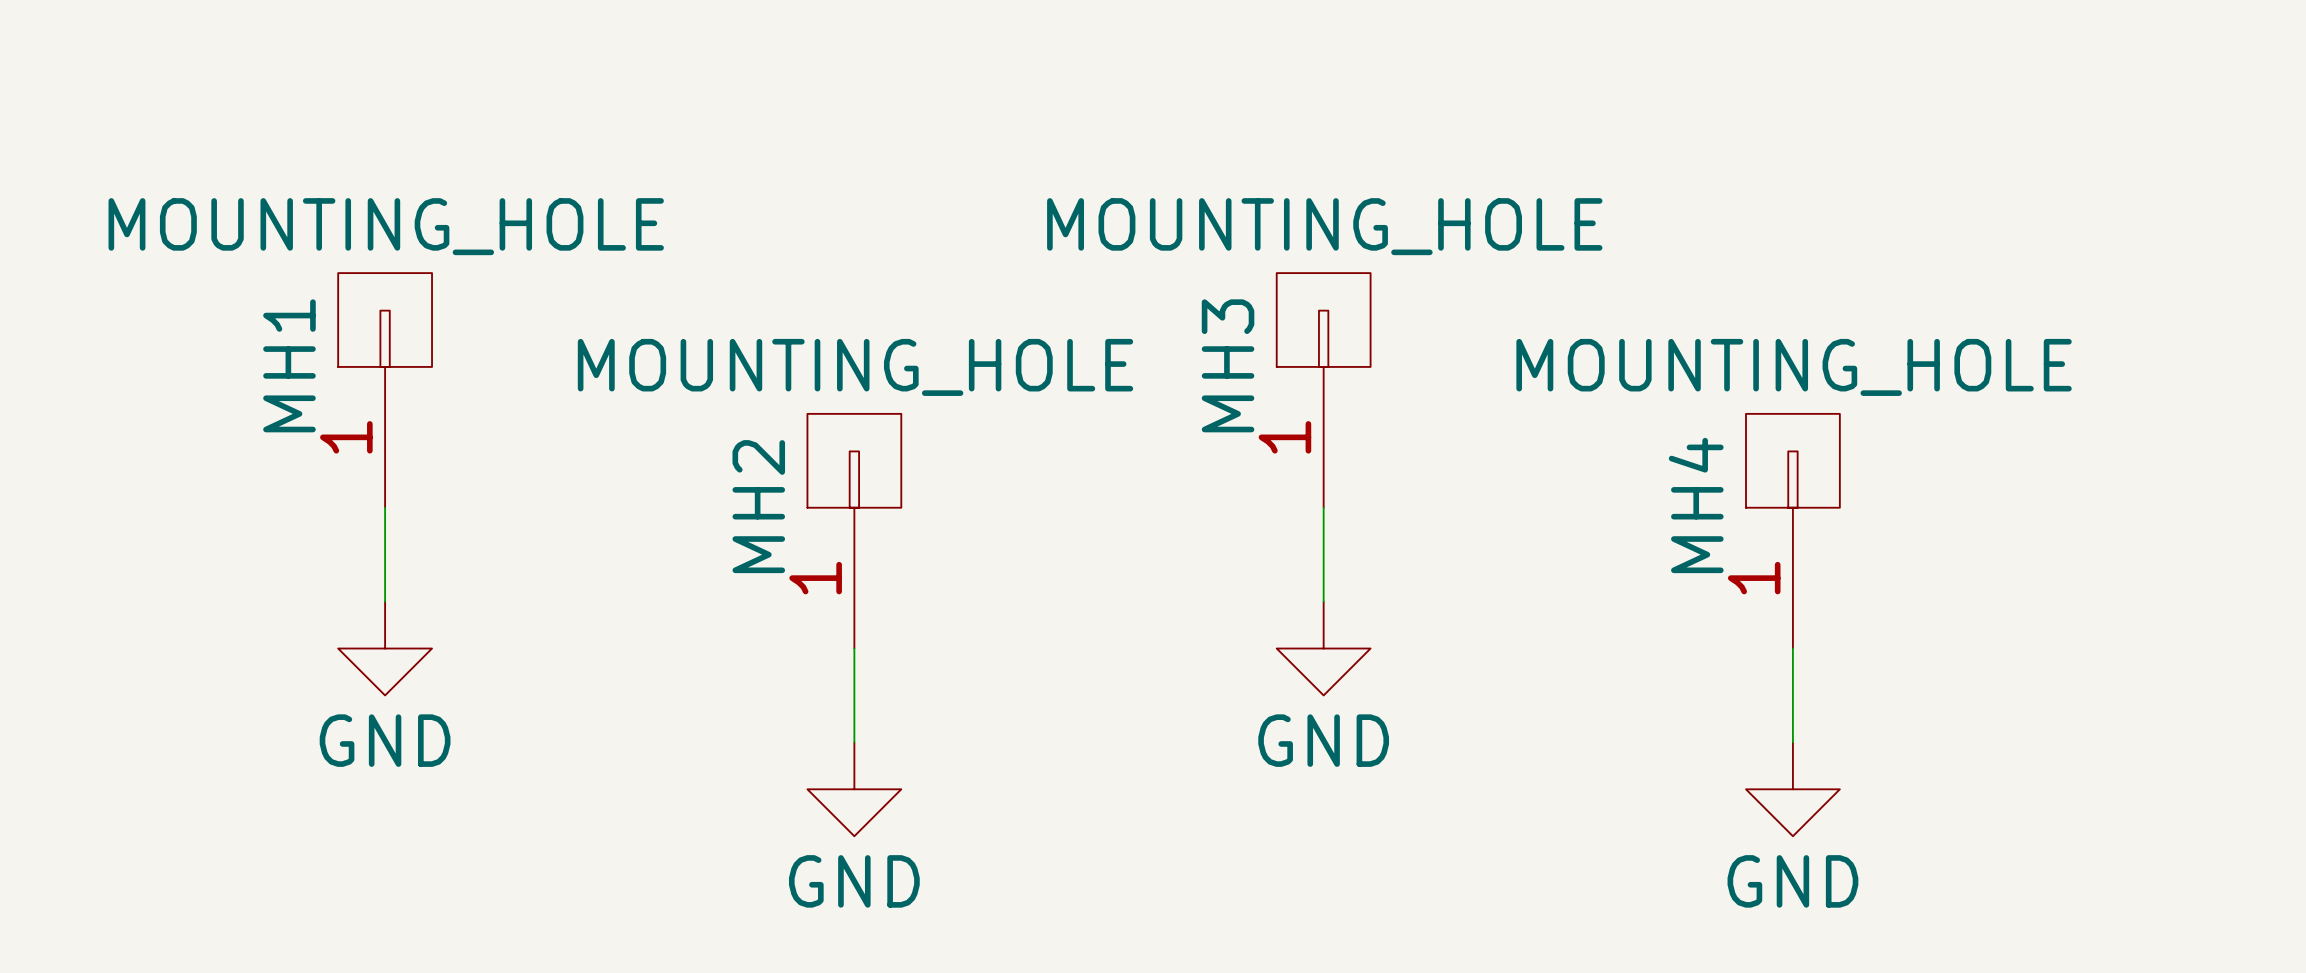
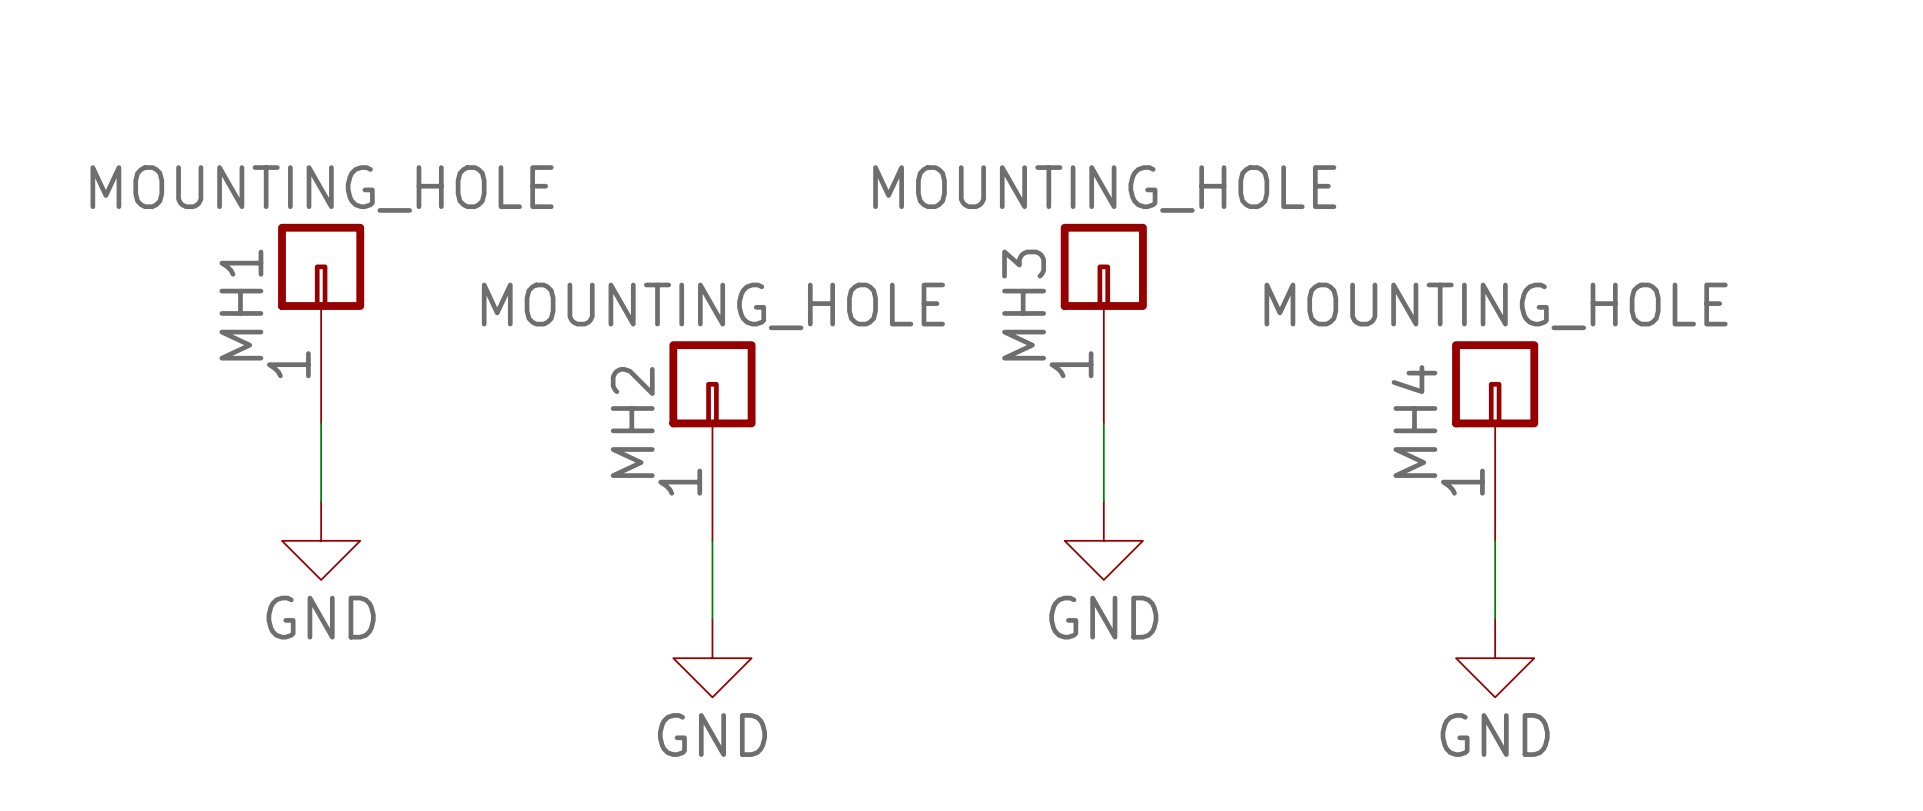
MH1 symbol: [338, 273, 433, 508] -> [278, 223, 365, 424]
MH3 symbol: [1276, 273, 1371, 508] -> [1060, 223, 1147, 424]
MH2 symbol: [807, 413, 902, 649] -> [669, 341, 756, 541]
MH4 symbol: [1746, 413, 1840, 649] -> [1452, 341, 1539, 541]

